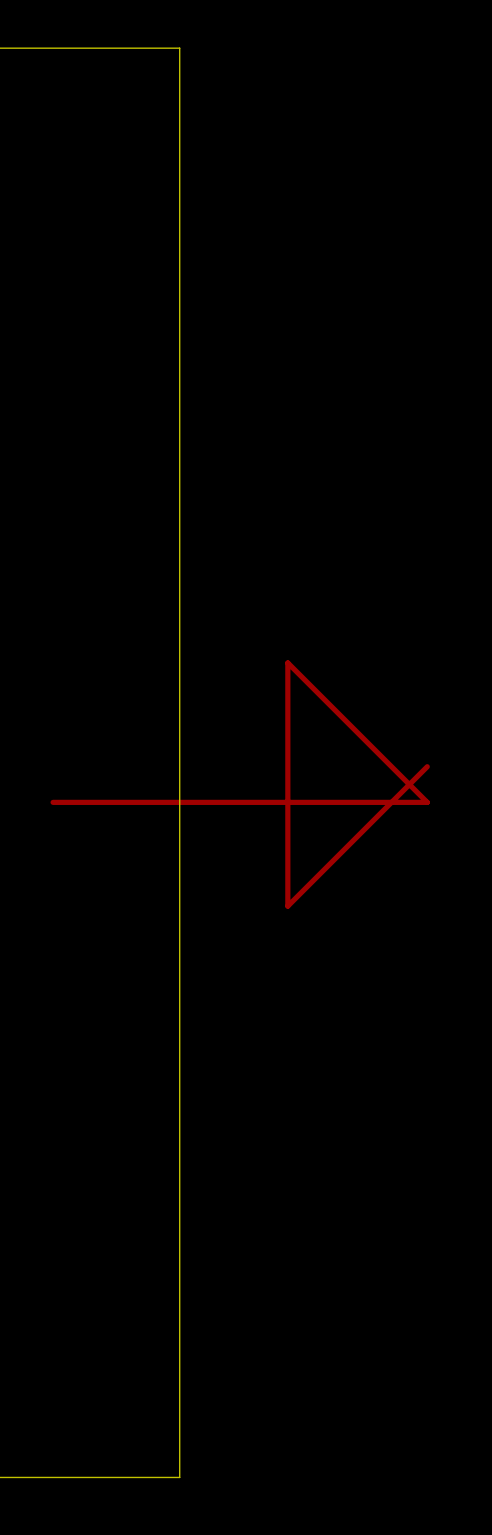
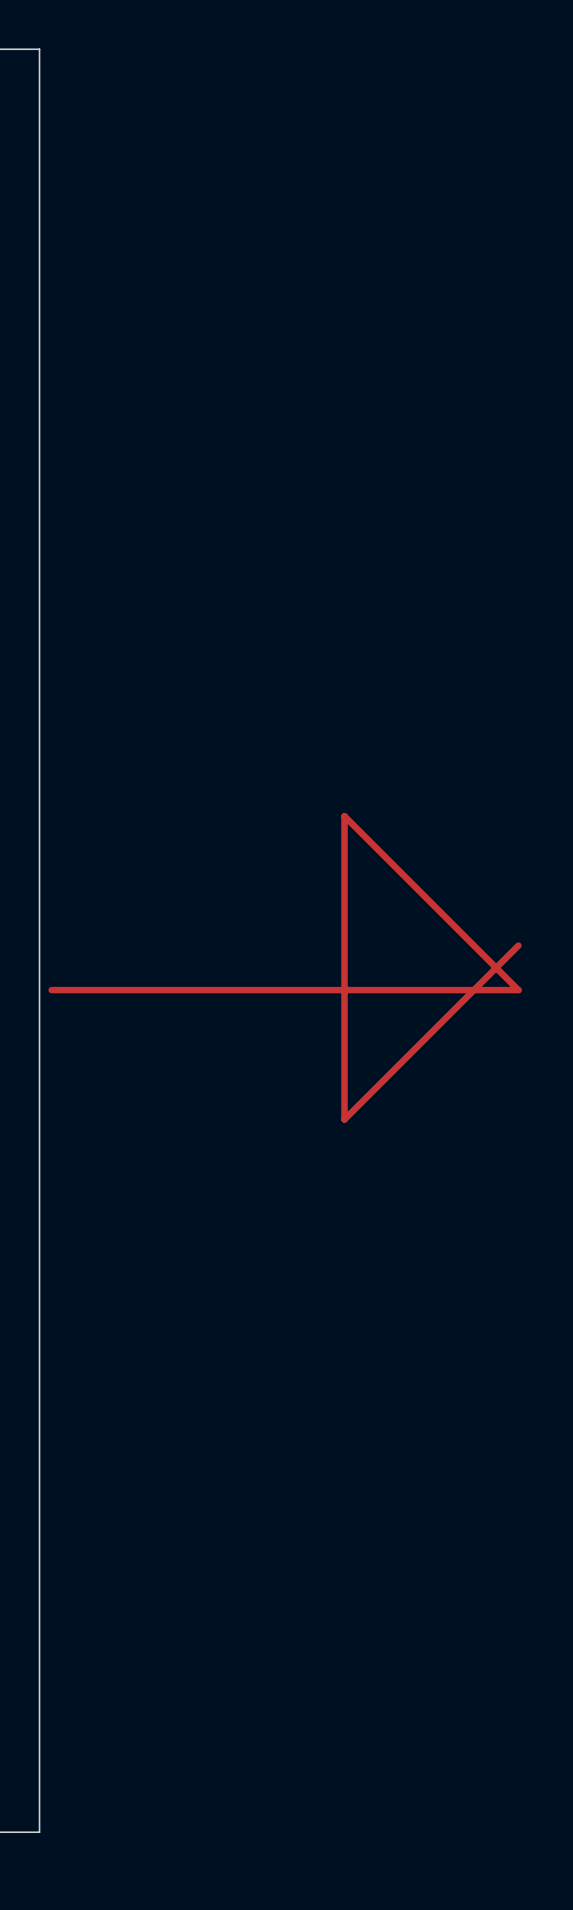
board edge: (43, 48) (179, 48) (179, 1477) (43, 1477) -> (39, 49) (39, 1832)

